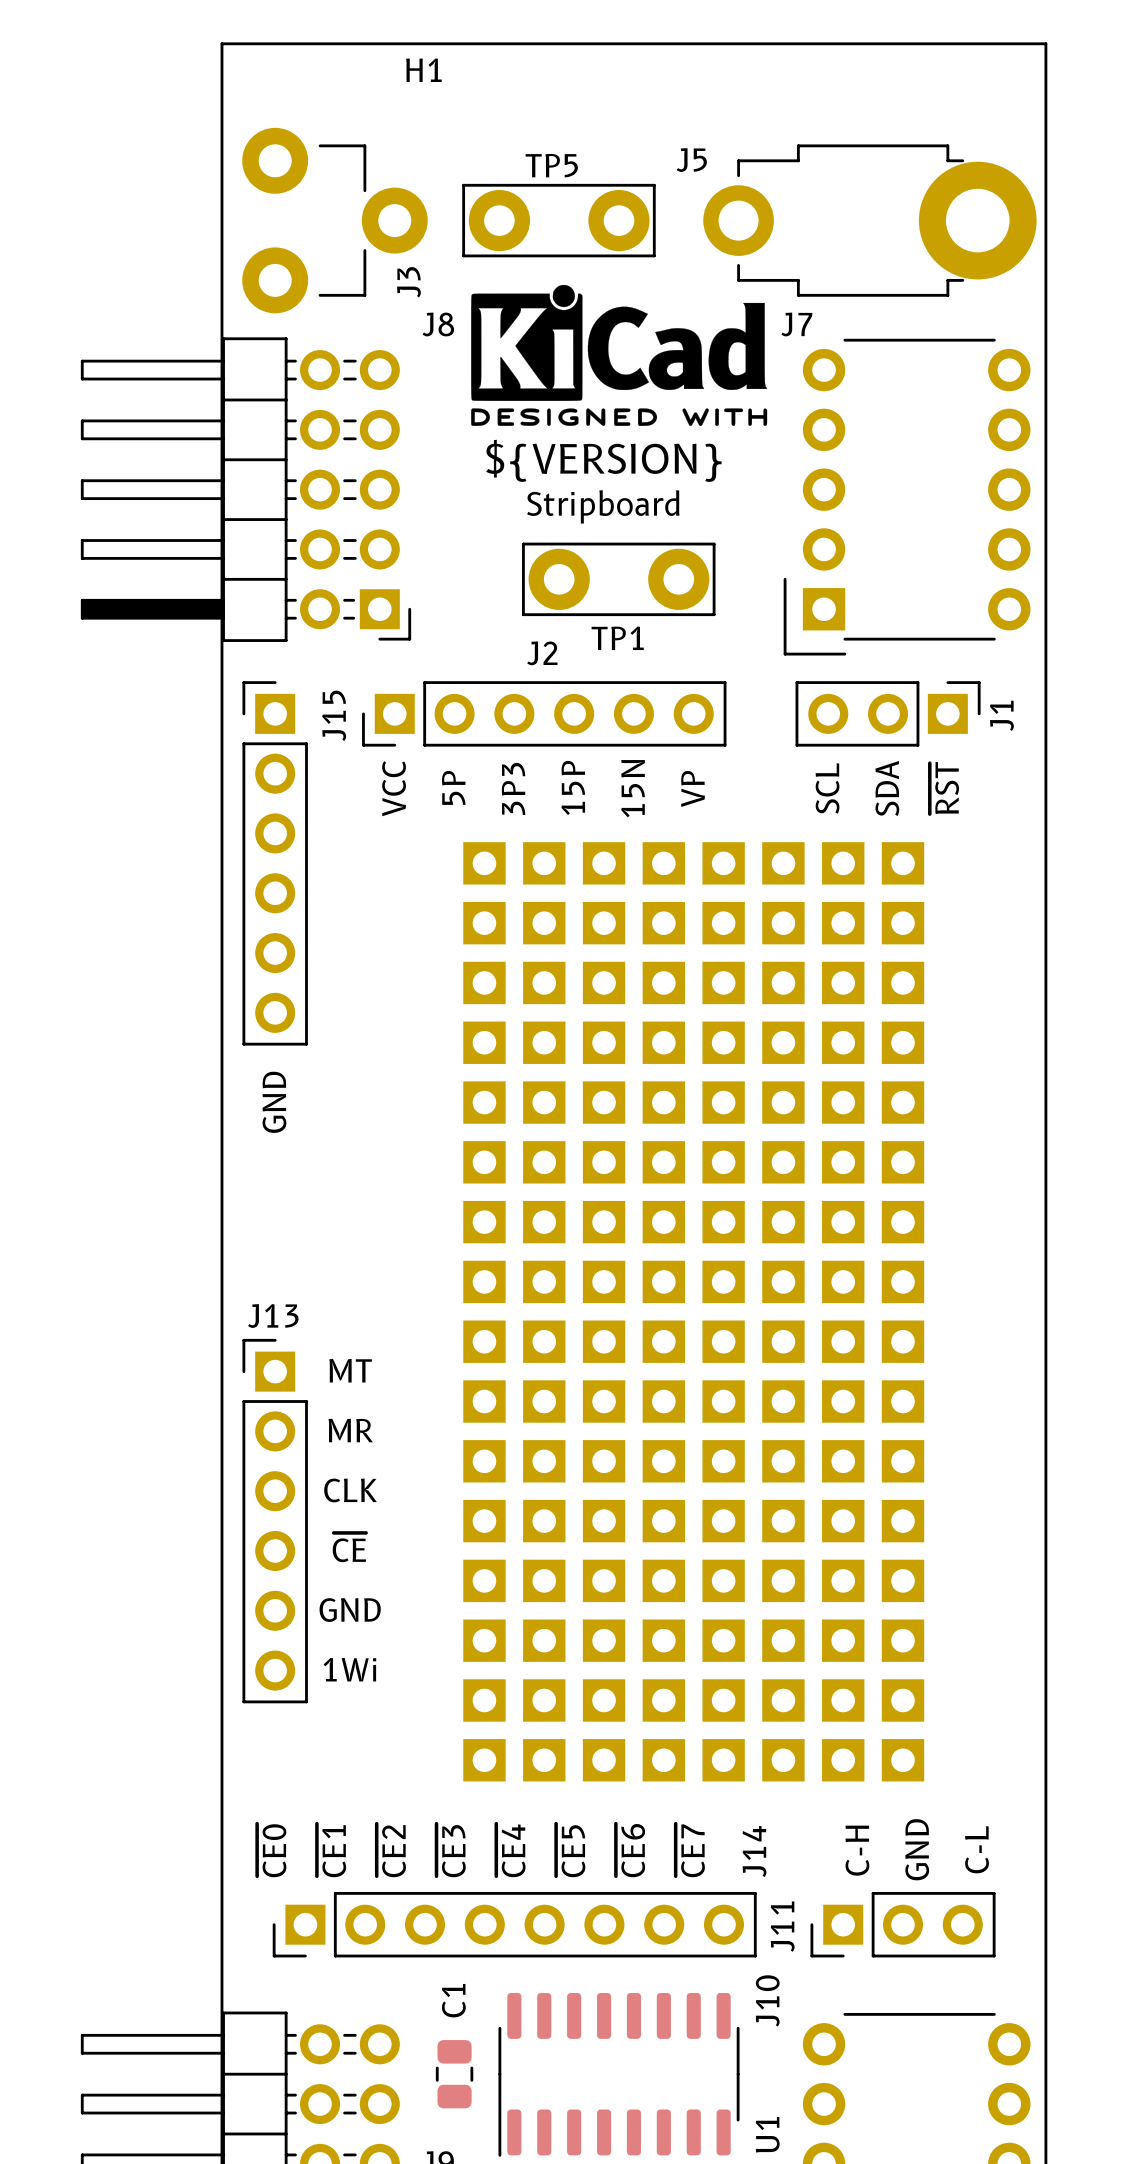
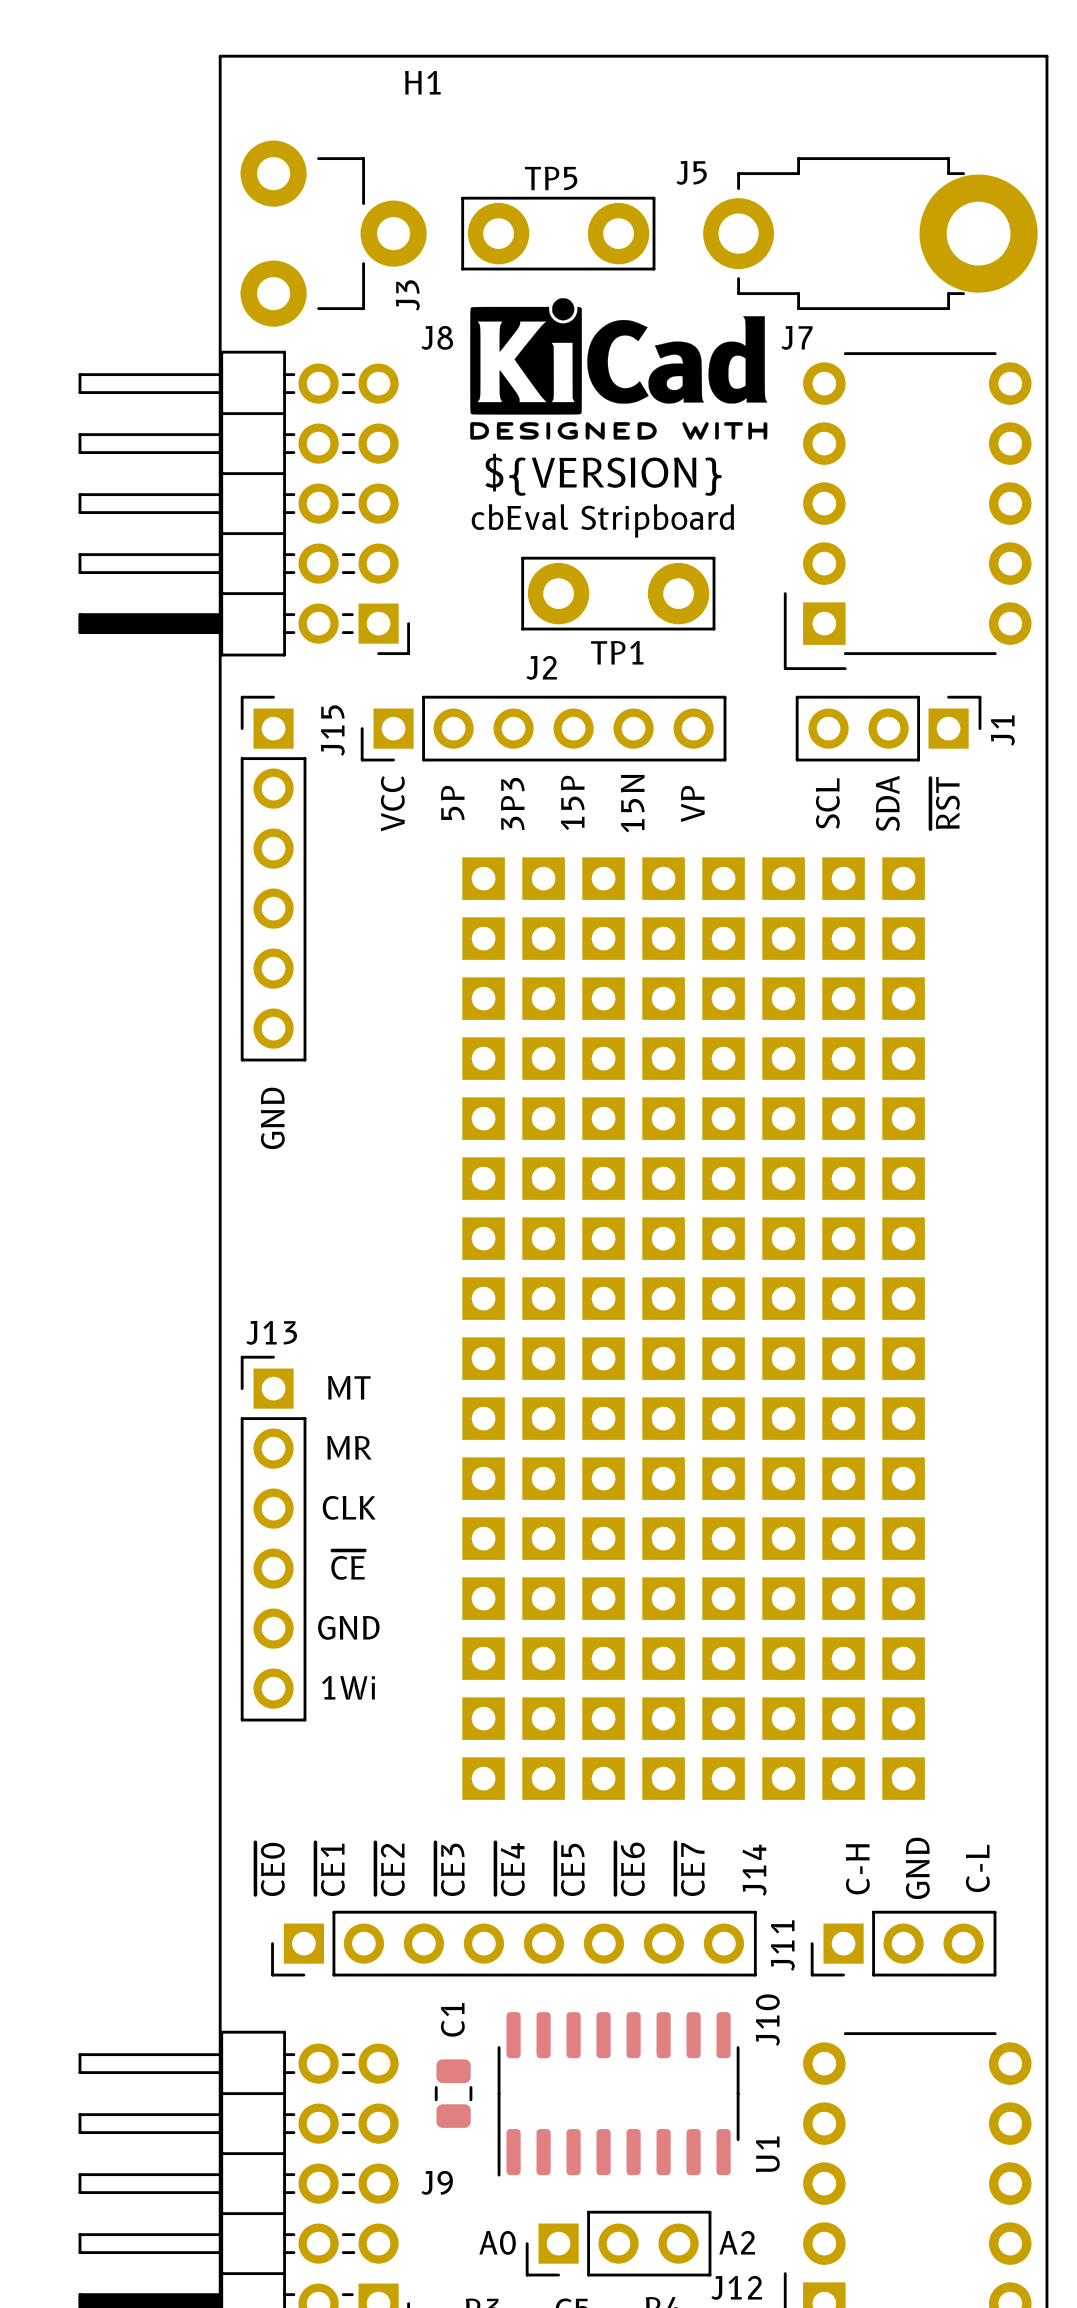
text: Stripboard (603, 506) -> cbEval Stripboard (602, 520)

